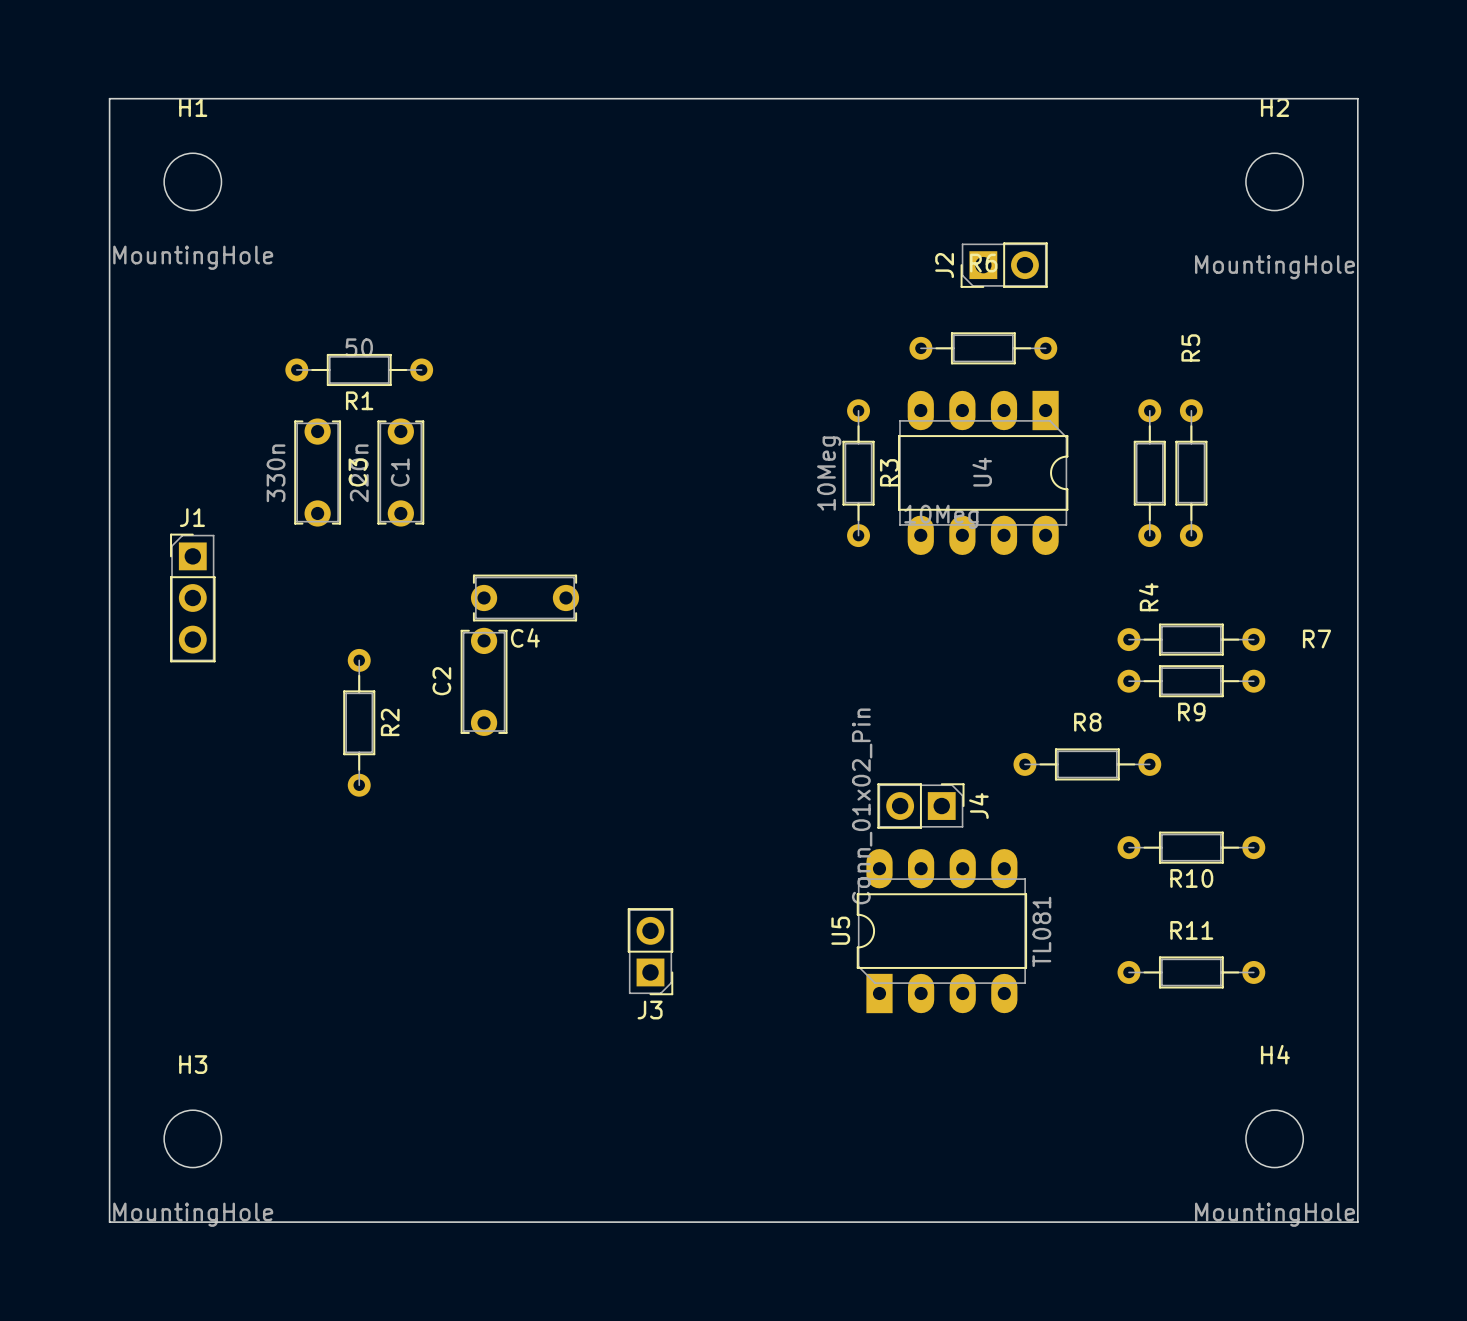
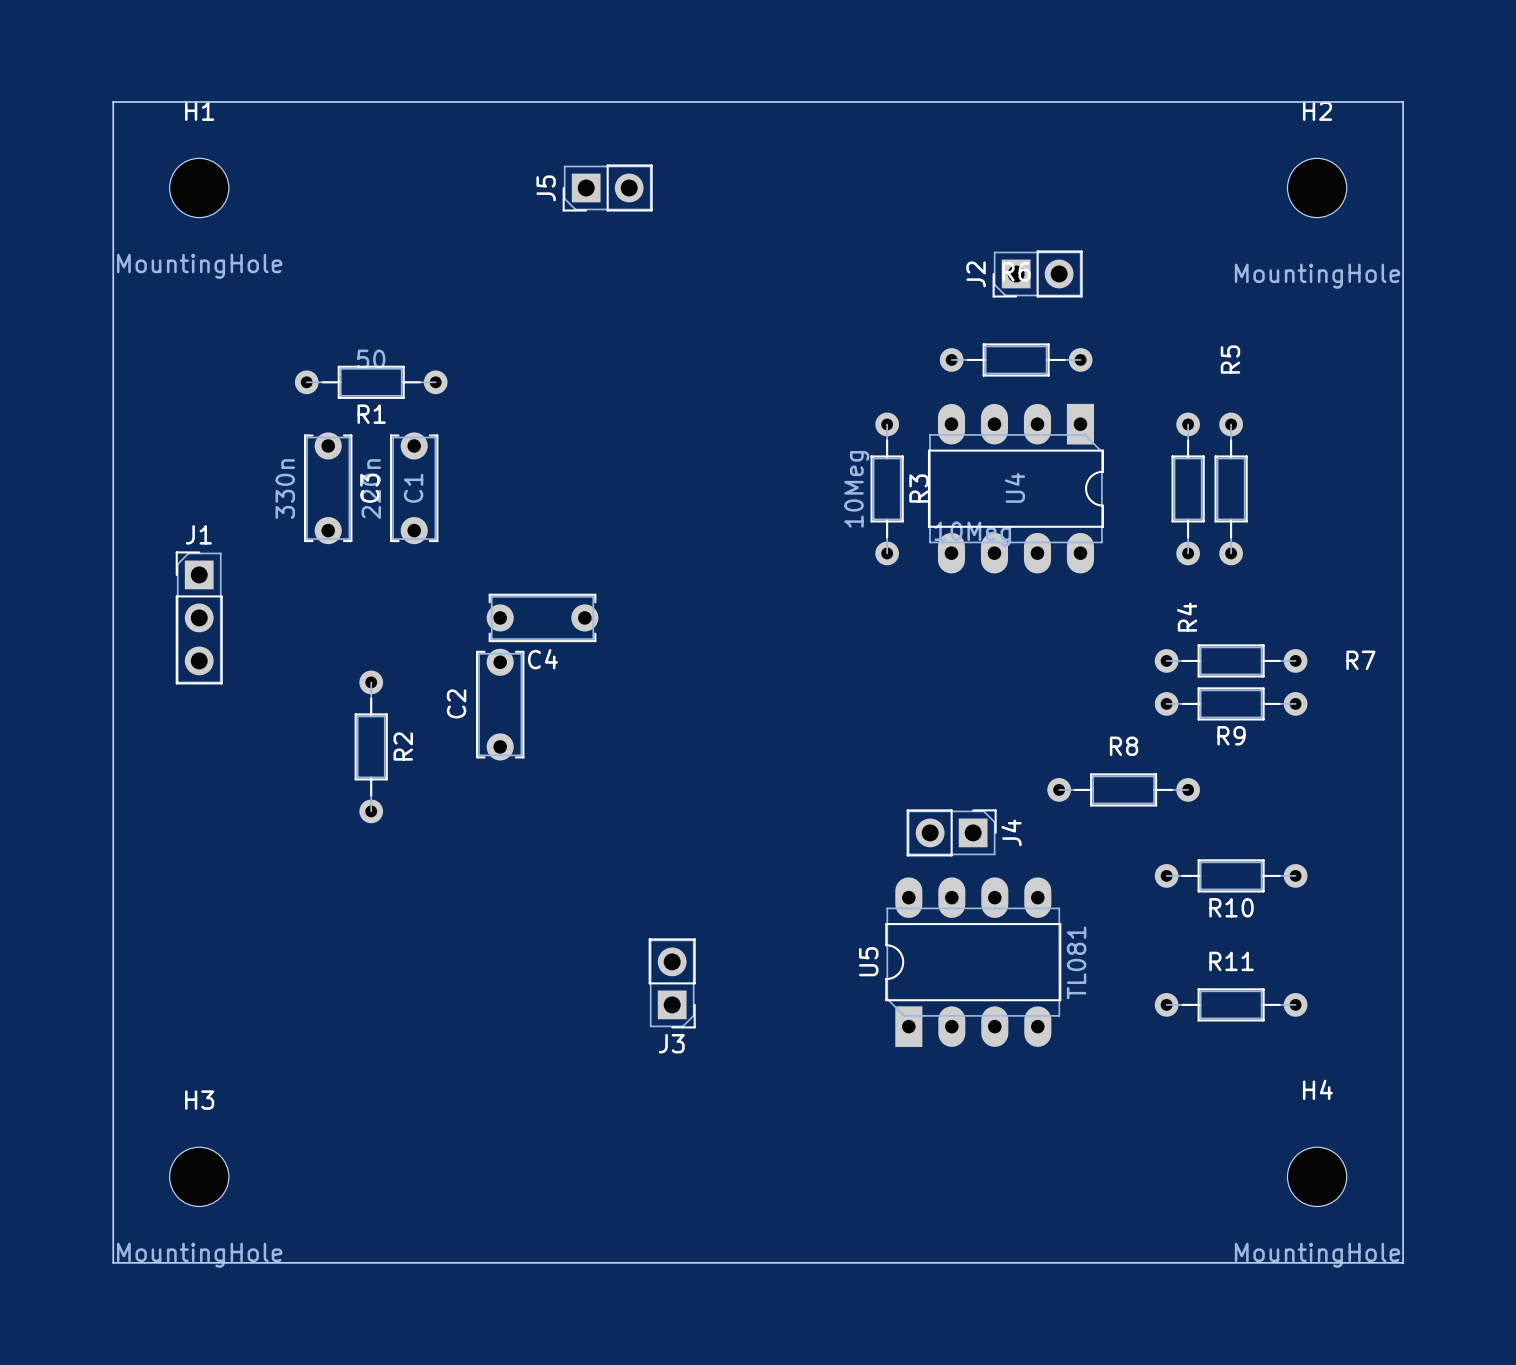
J5: none -> (607, 187)
J4 value: Conn_01x02_Pin (862, 806) -> none

